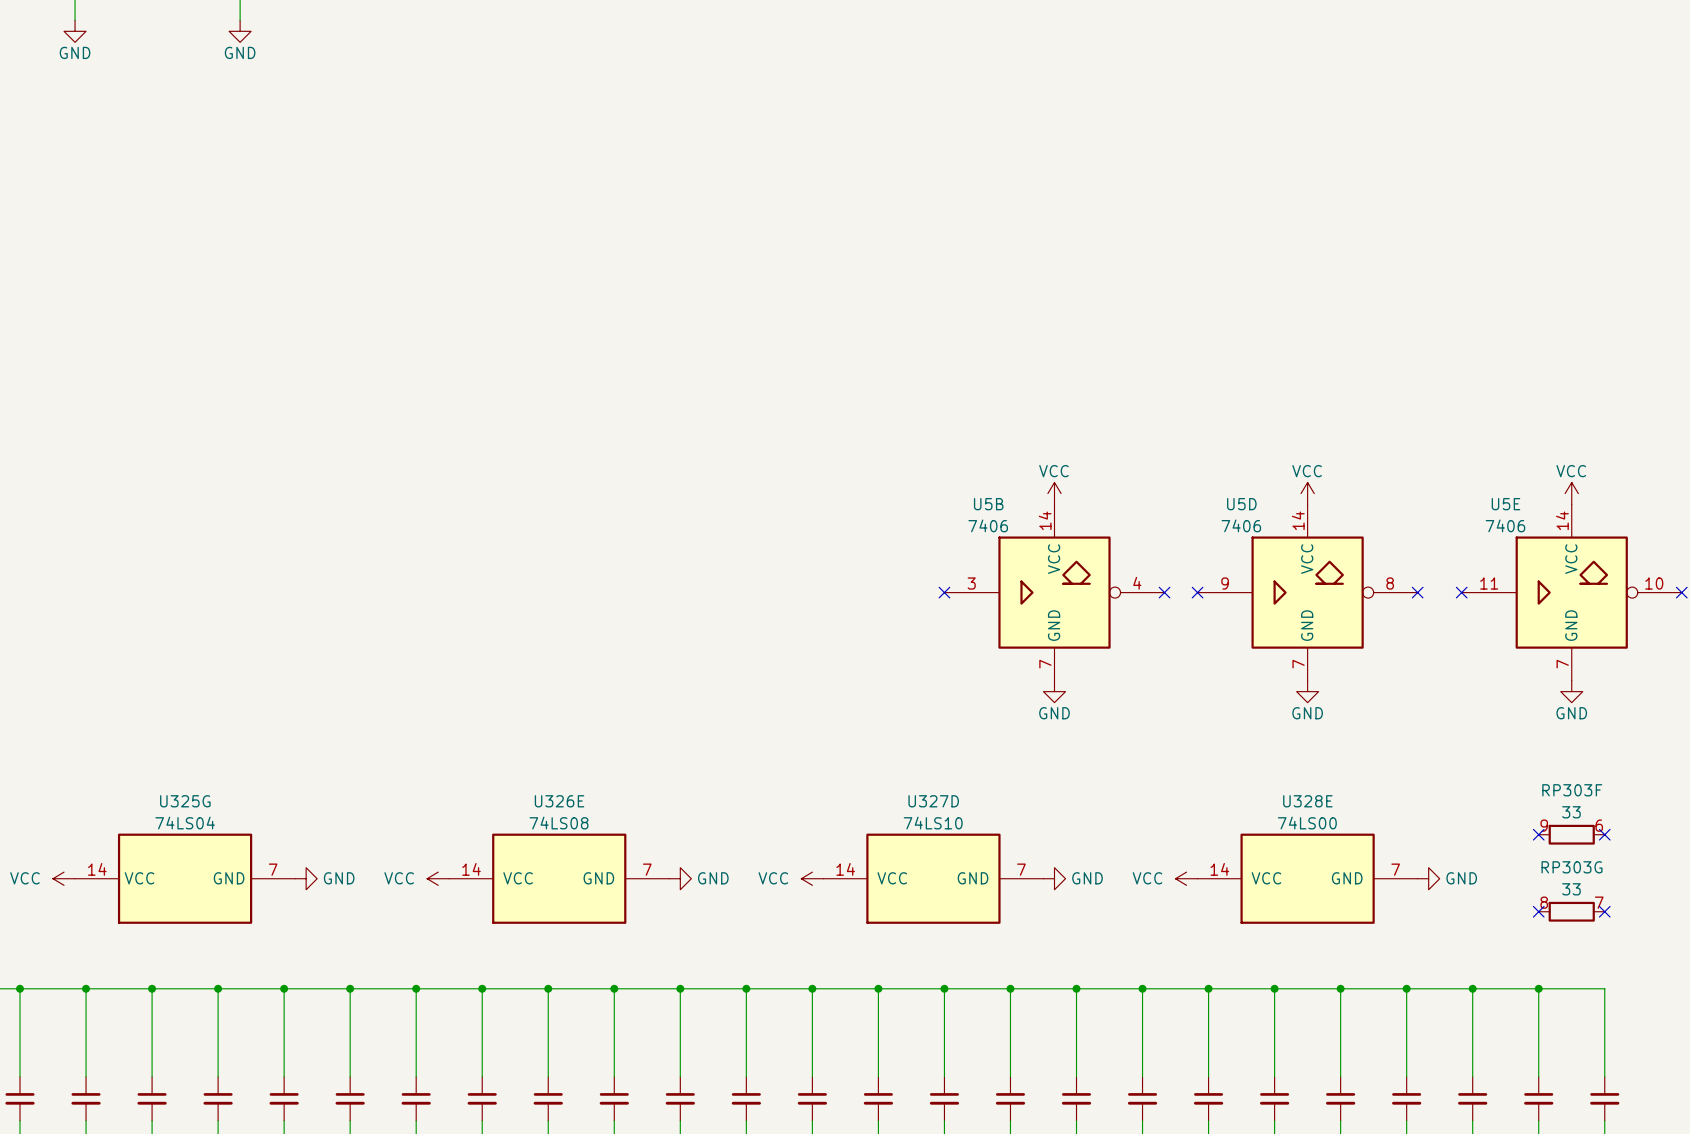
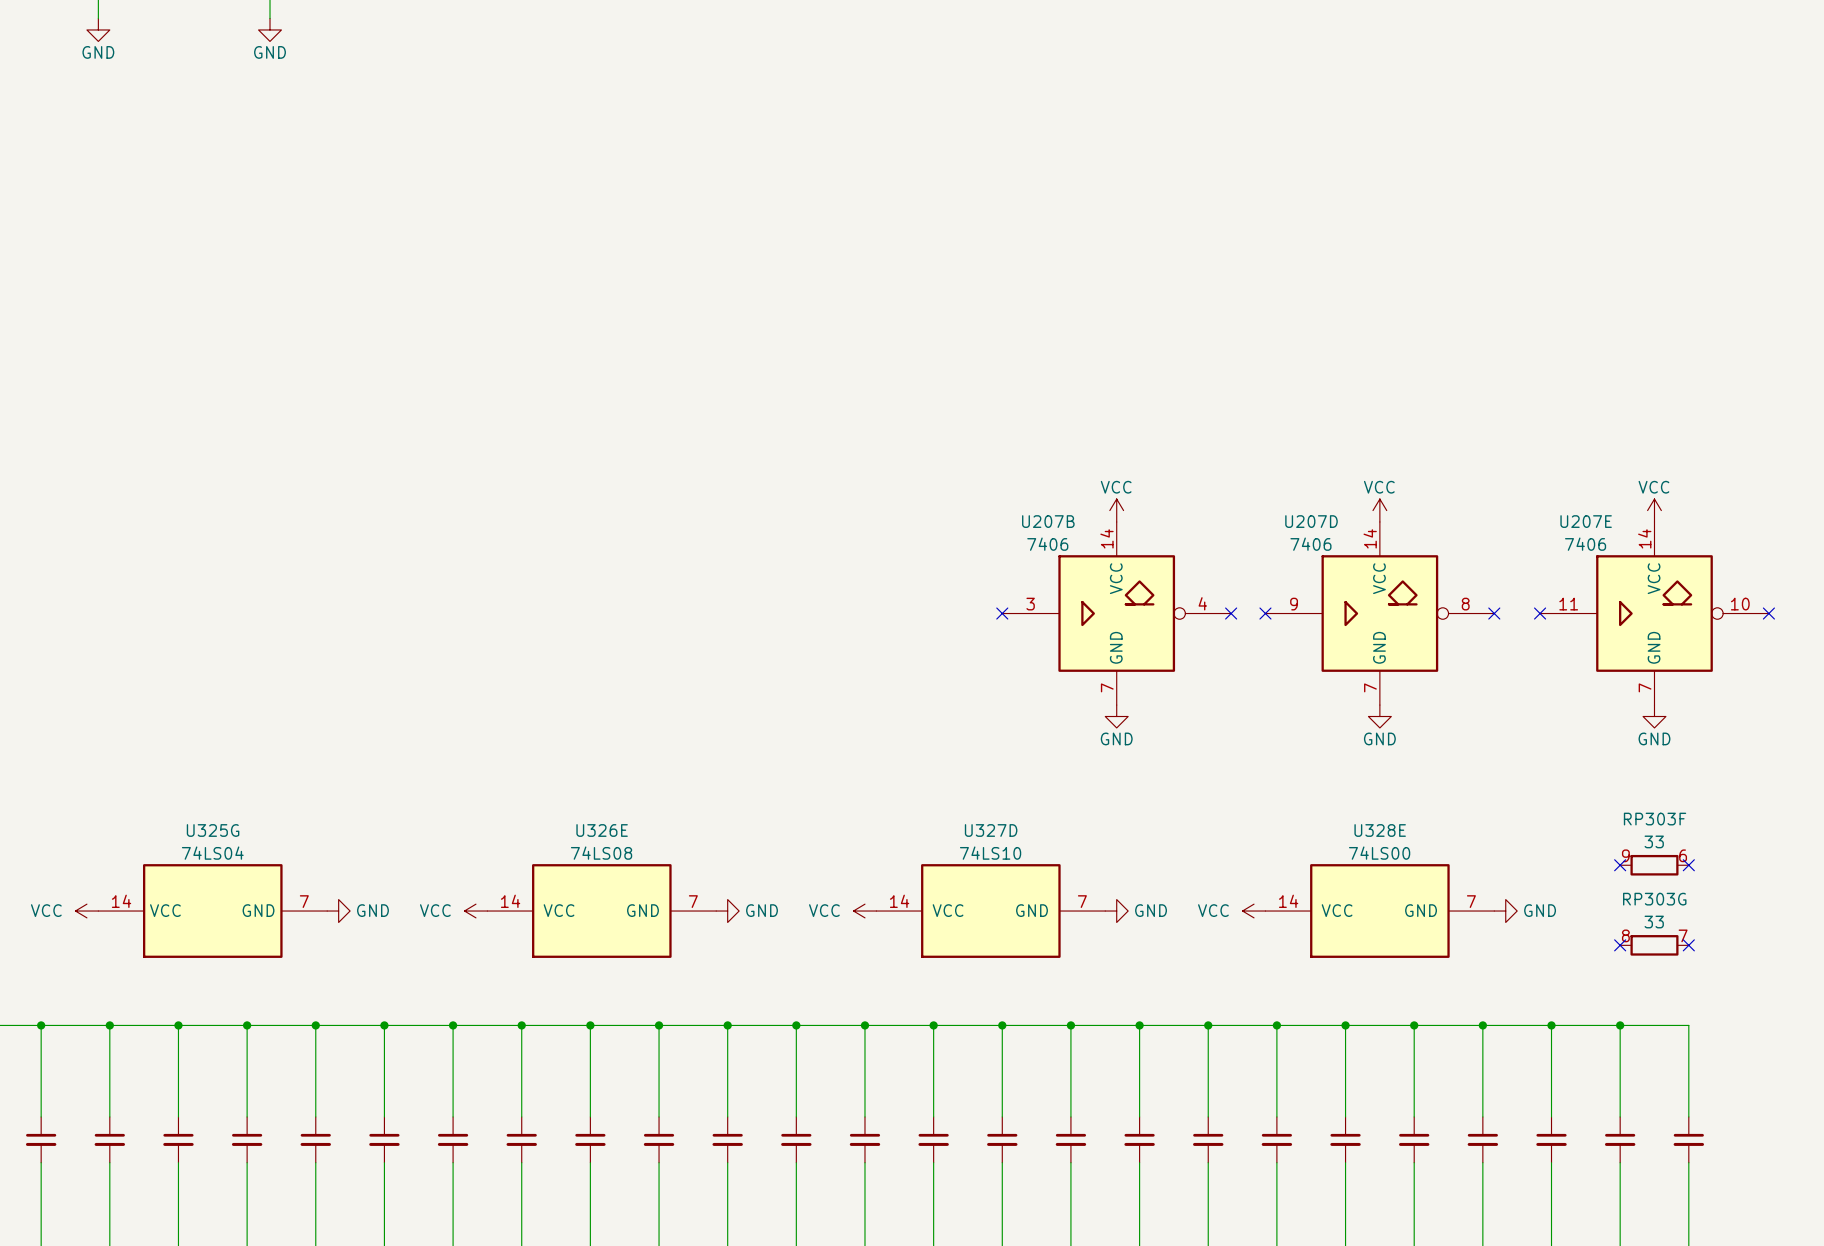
U5B name: U5B (988, 504) -> U207B (1048, 521)
U5D name: U5D (1241, 504) -> U207D (1311, 521)
U5E name: U5E (1505, 504) -> U207E (1586, 521)

